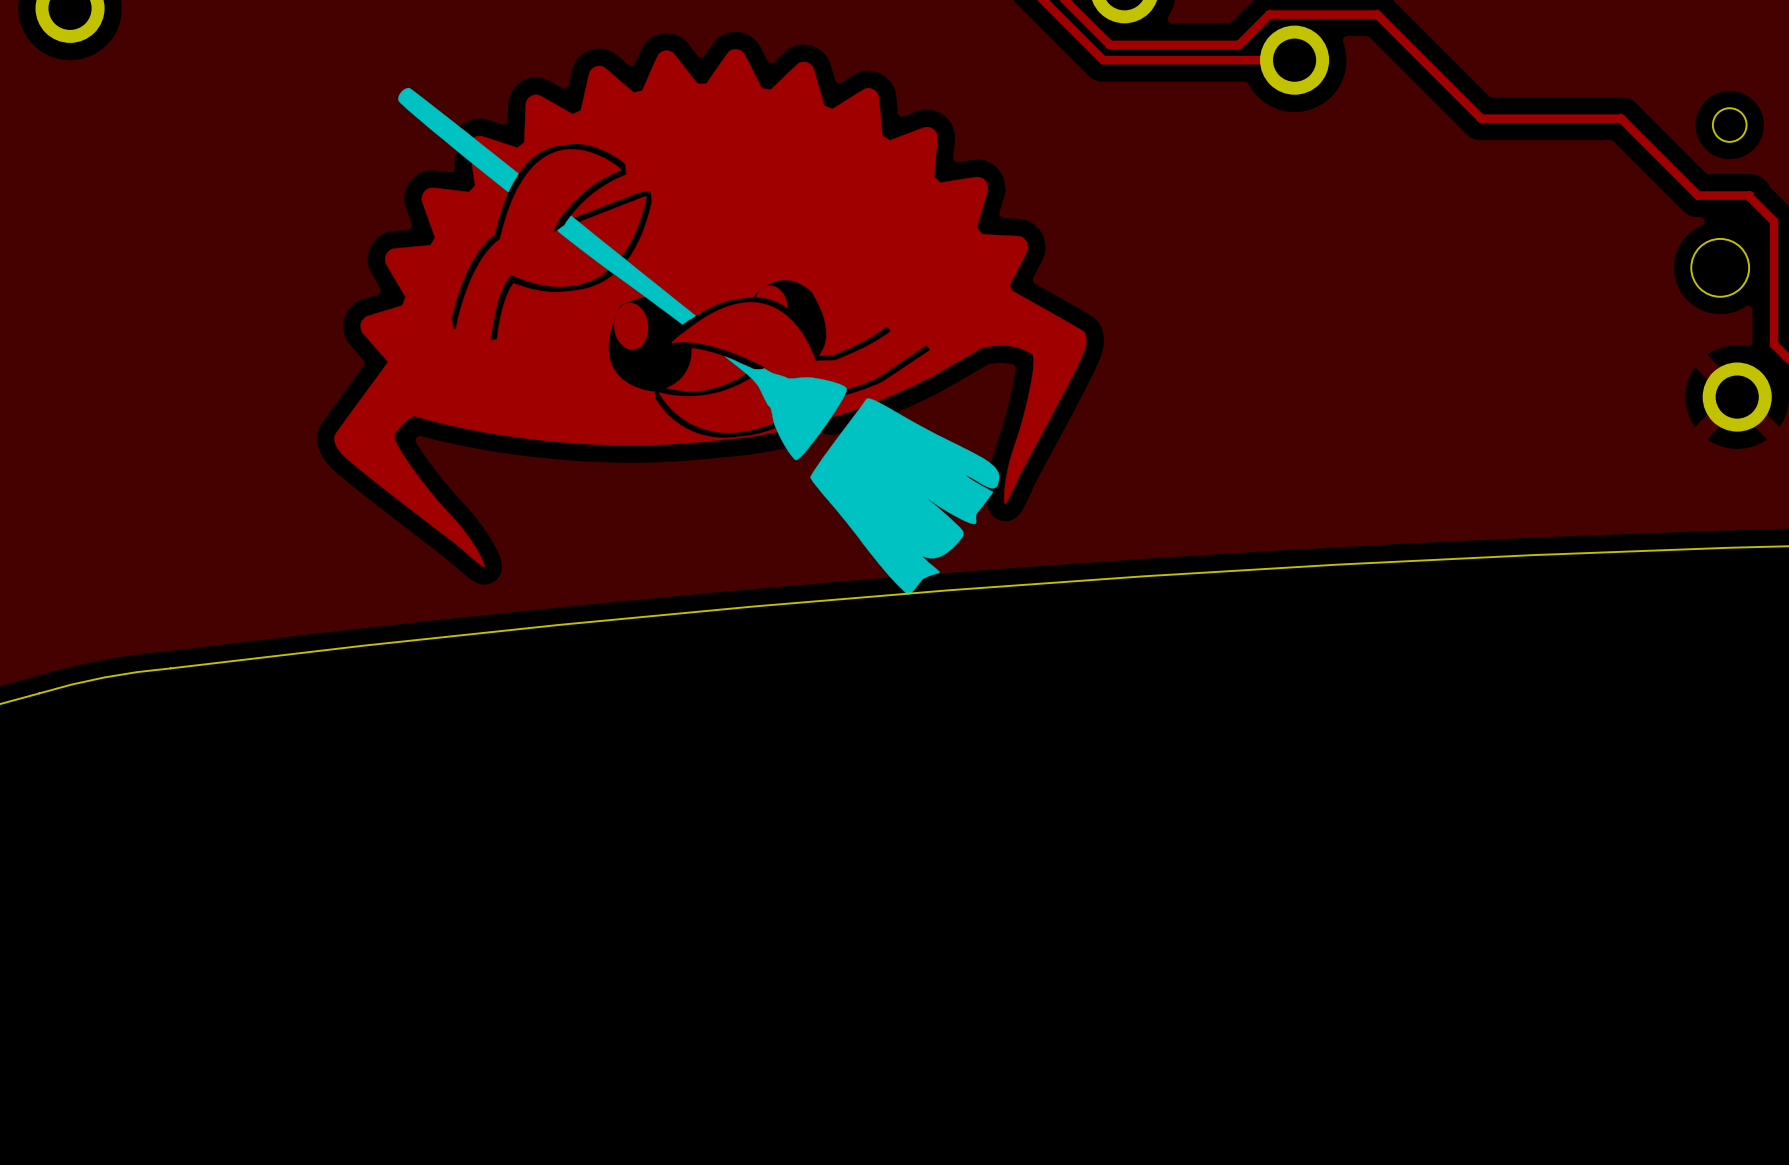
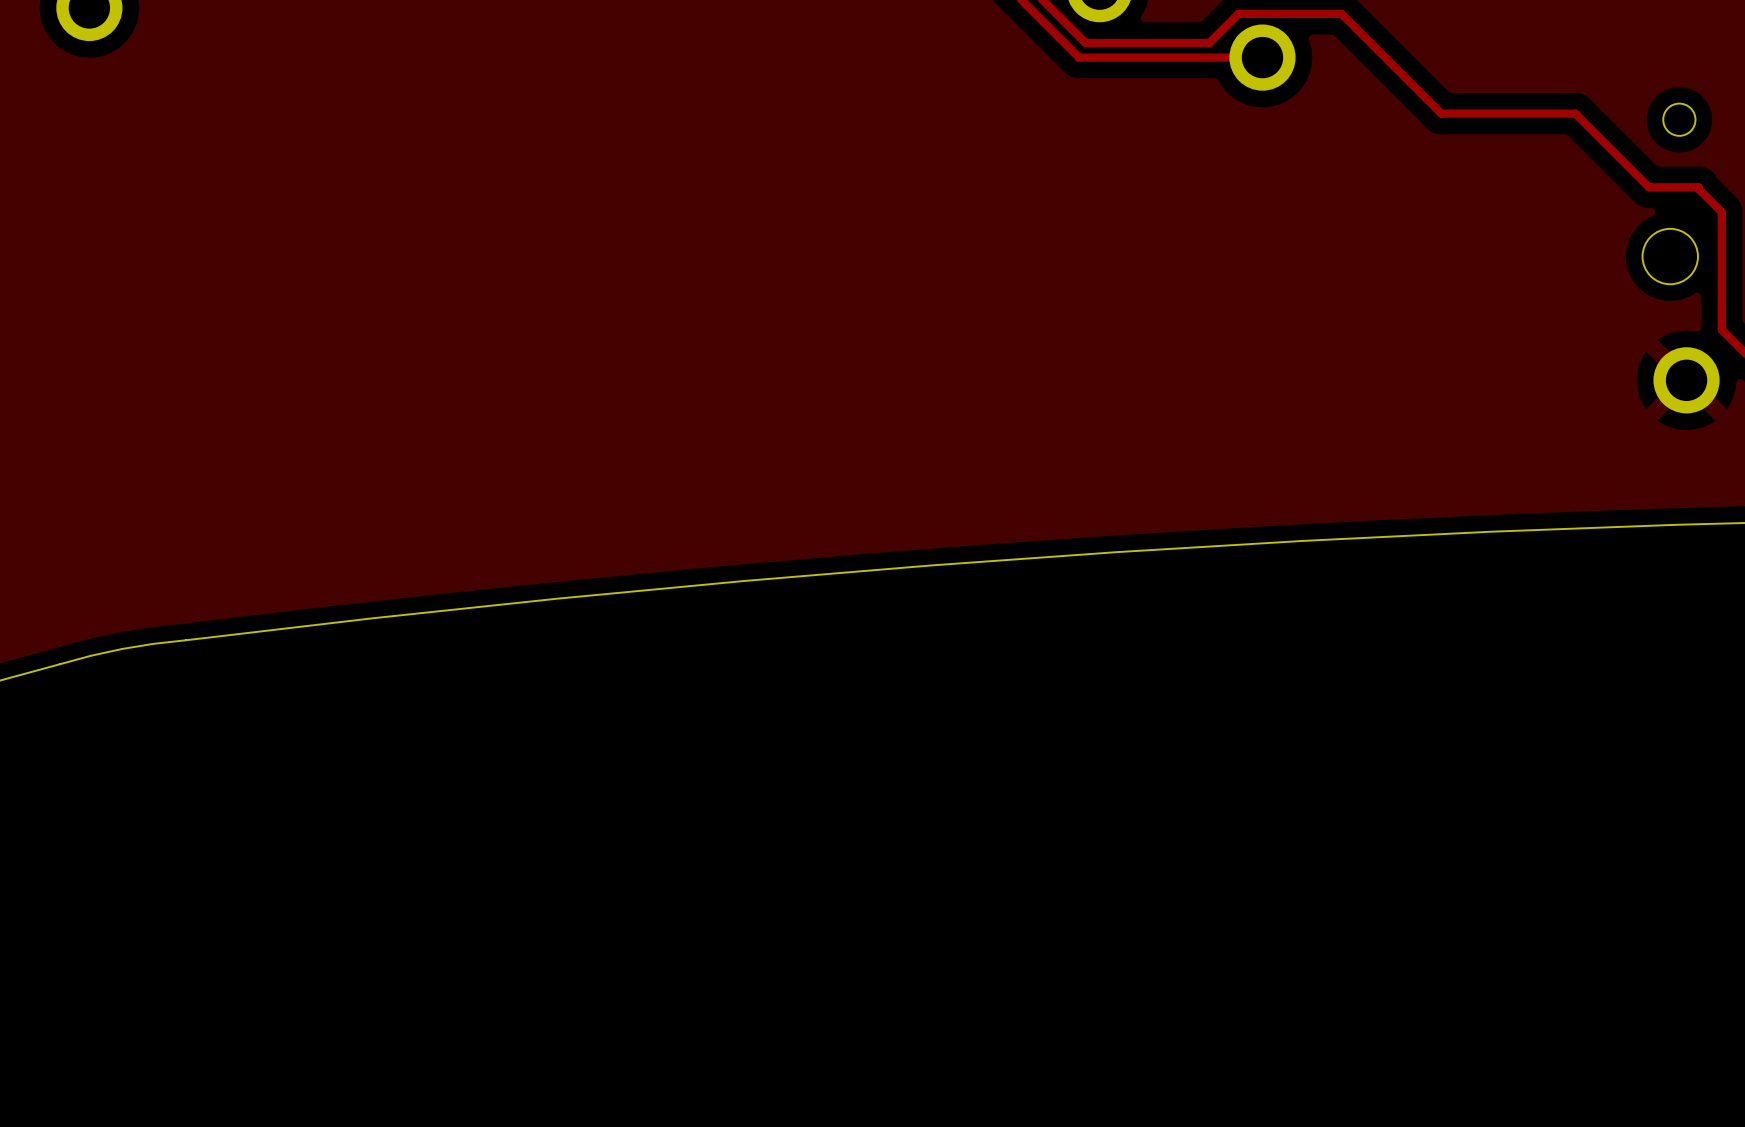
drawing: [334, 49, 1087, 595] -> none

